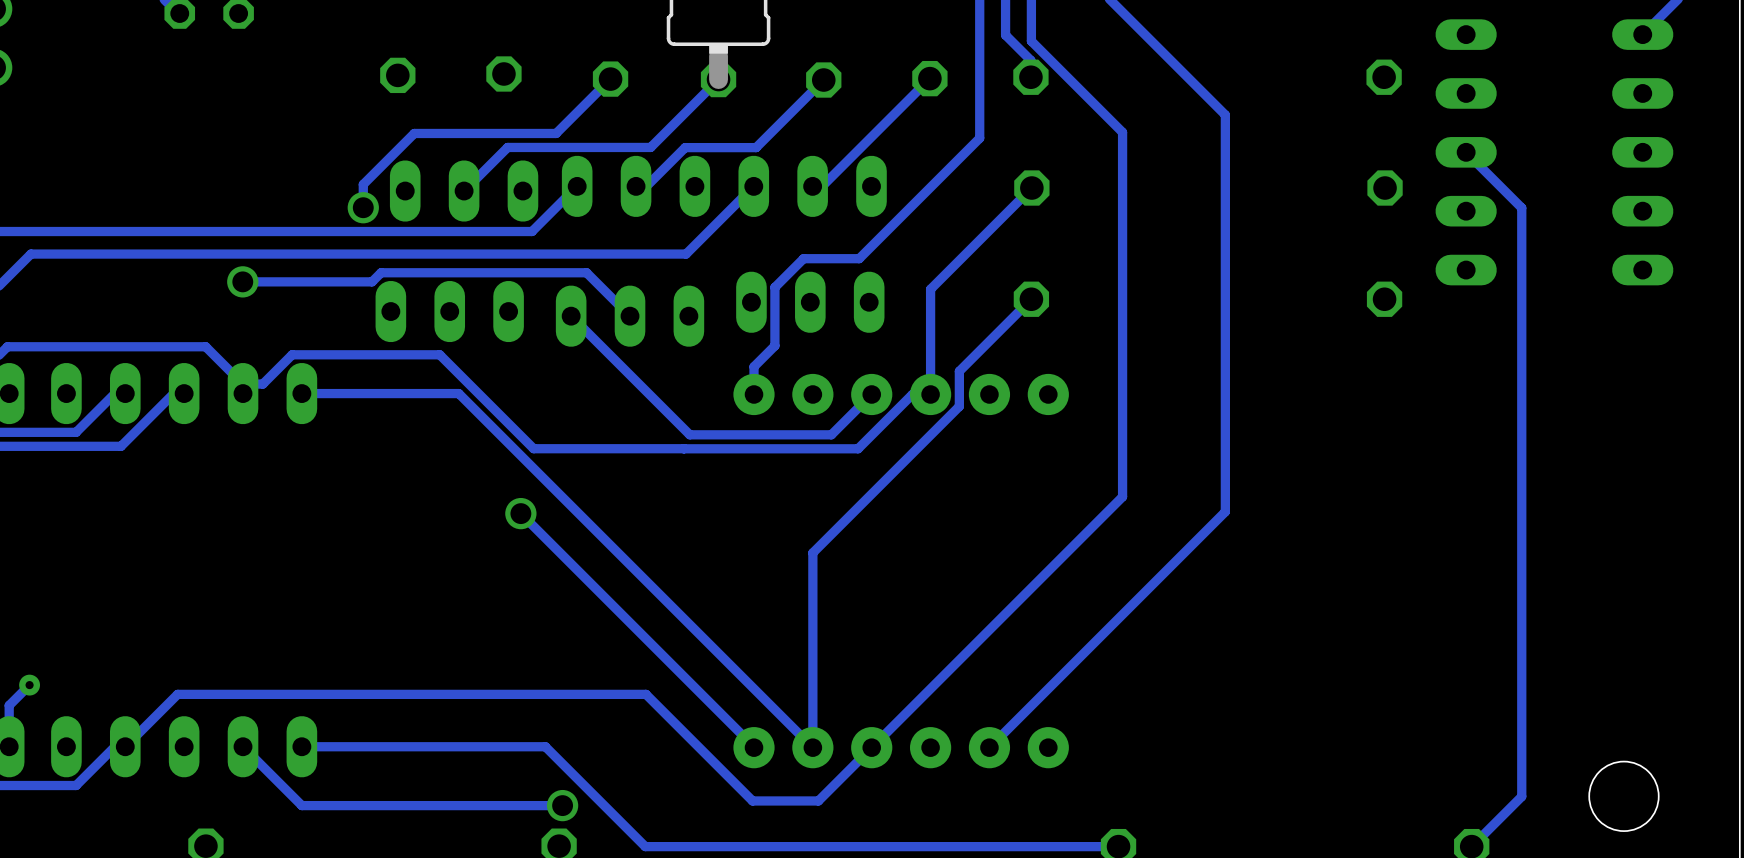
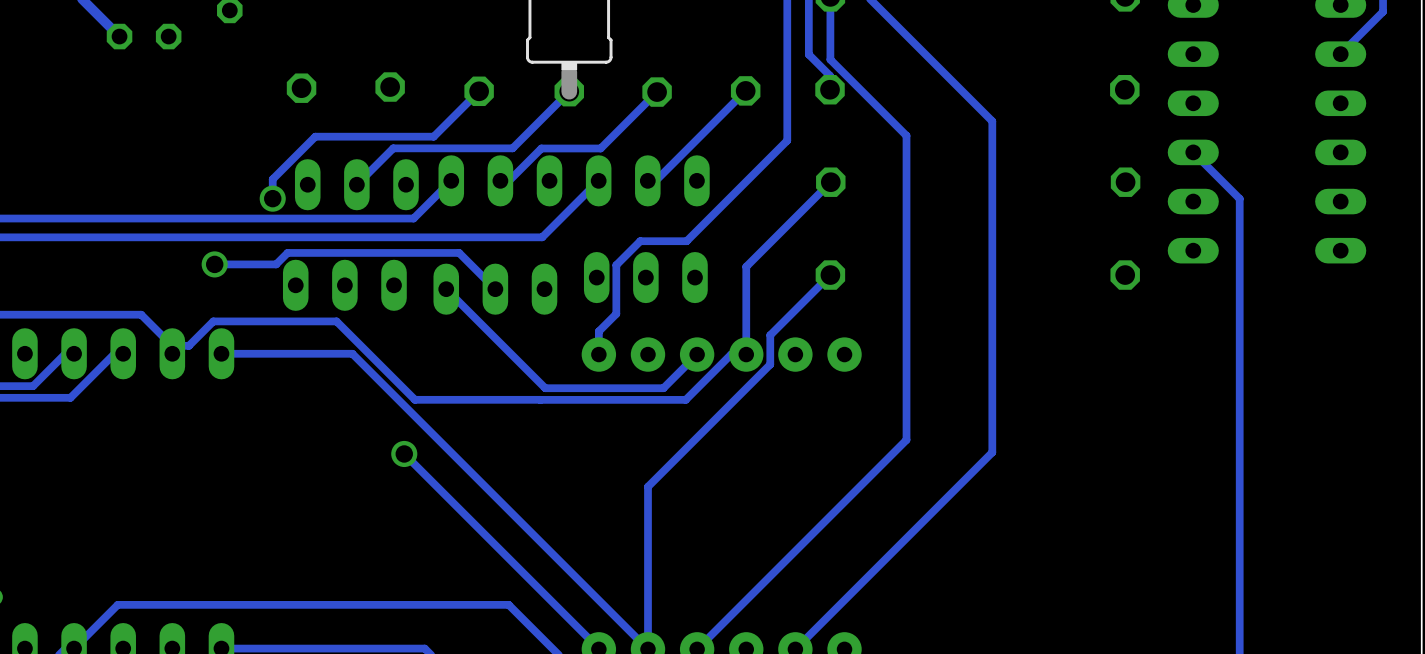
via position: (242, 281) -> (214, 264)
track: (372, 281) (242, 281) -> (280, 260) (276, 264) (214, 264)

